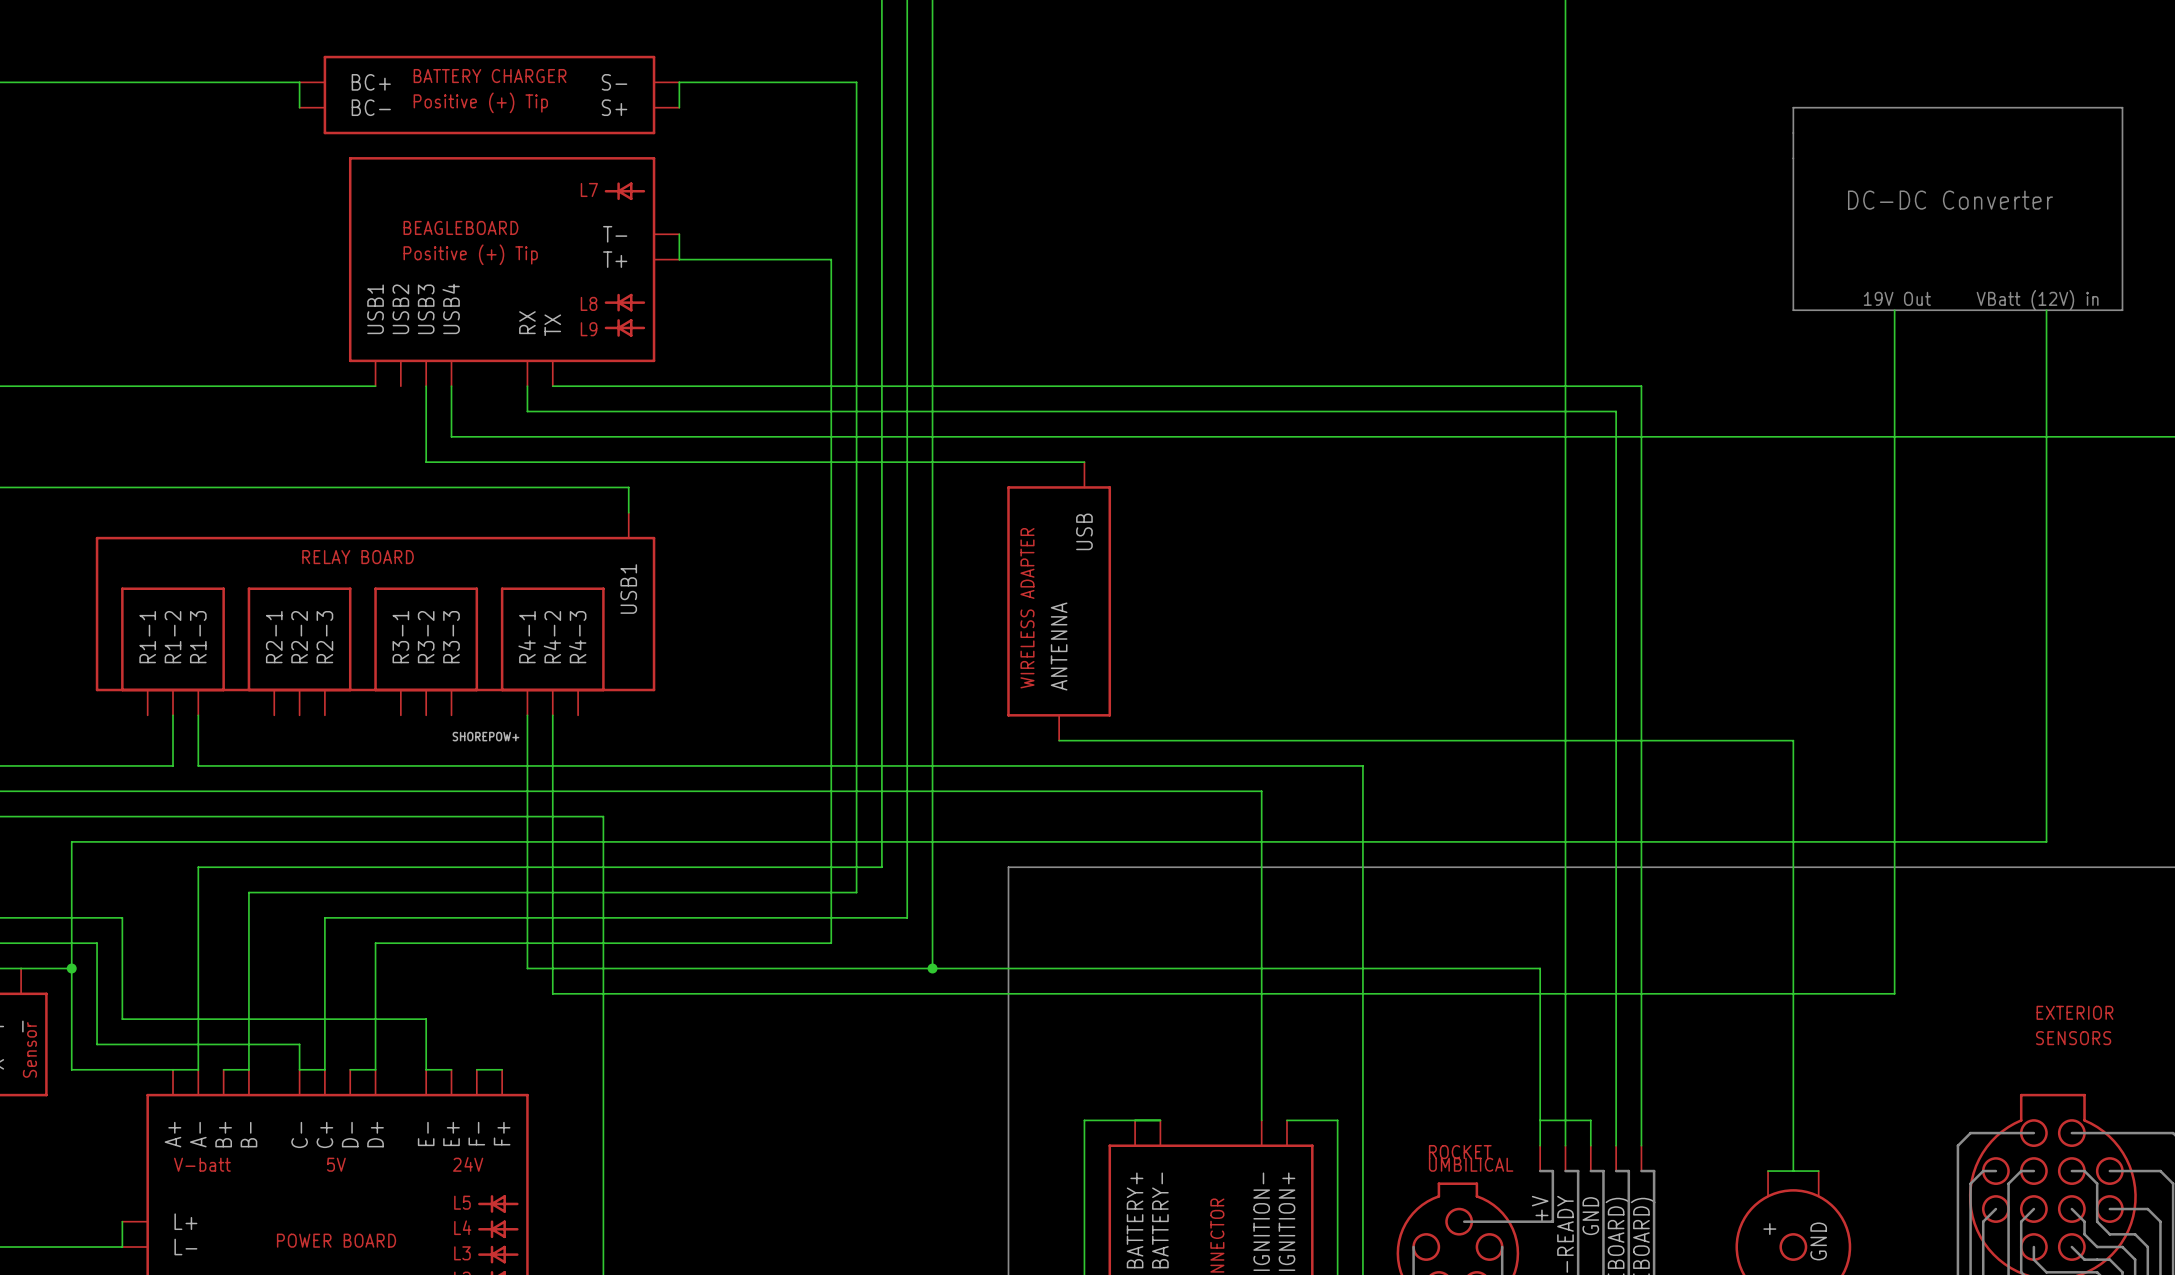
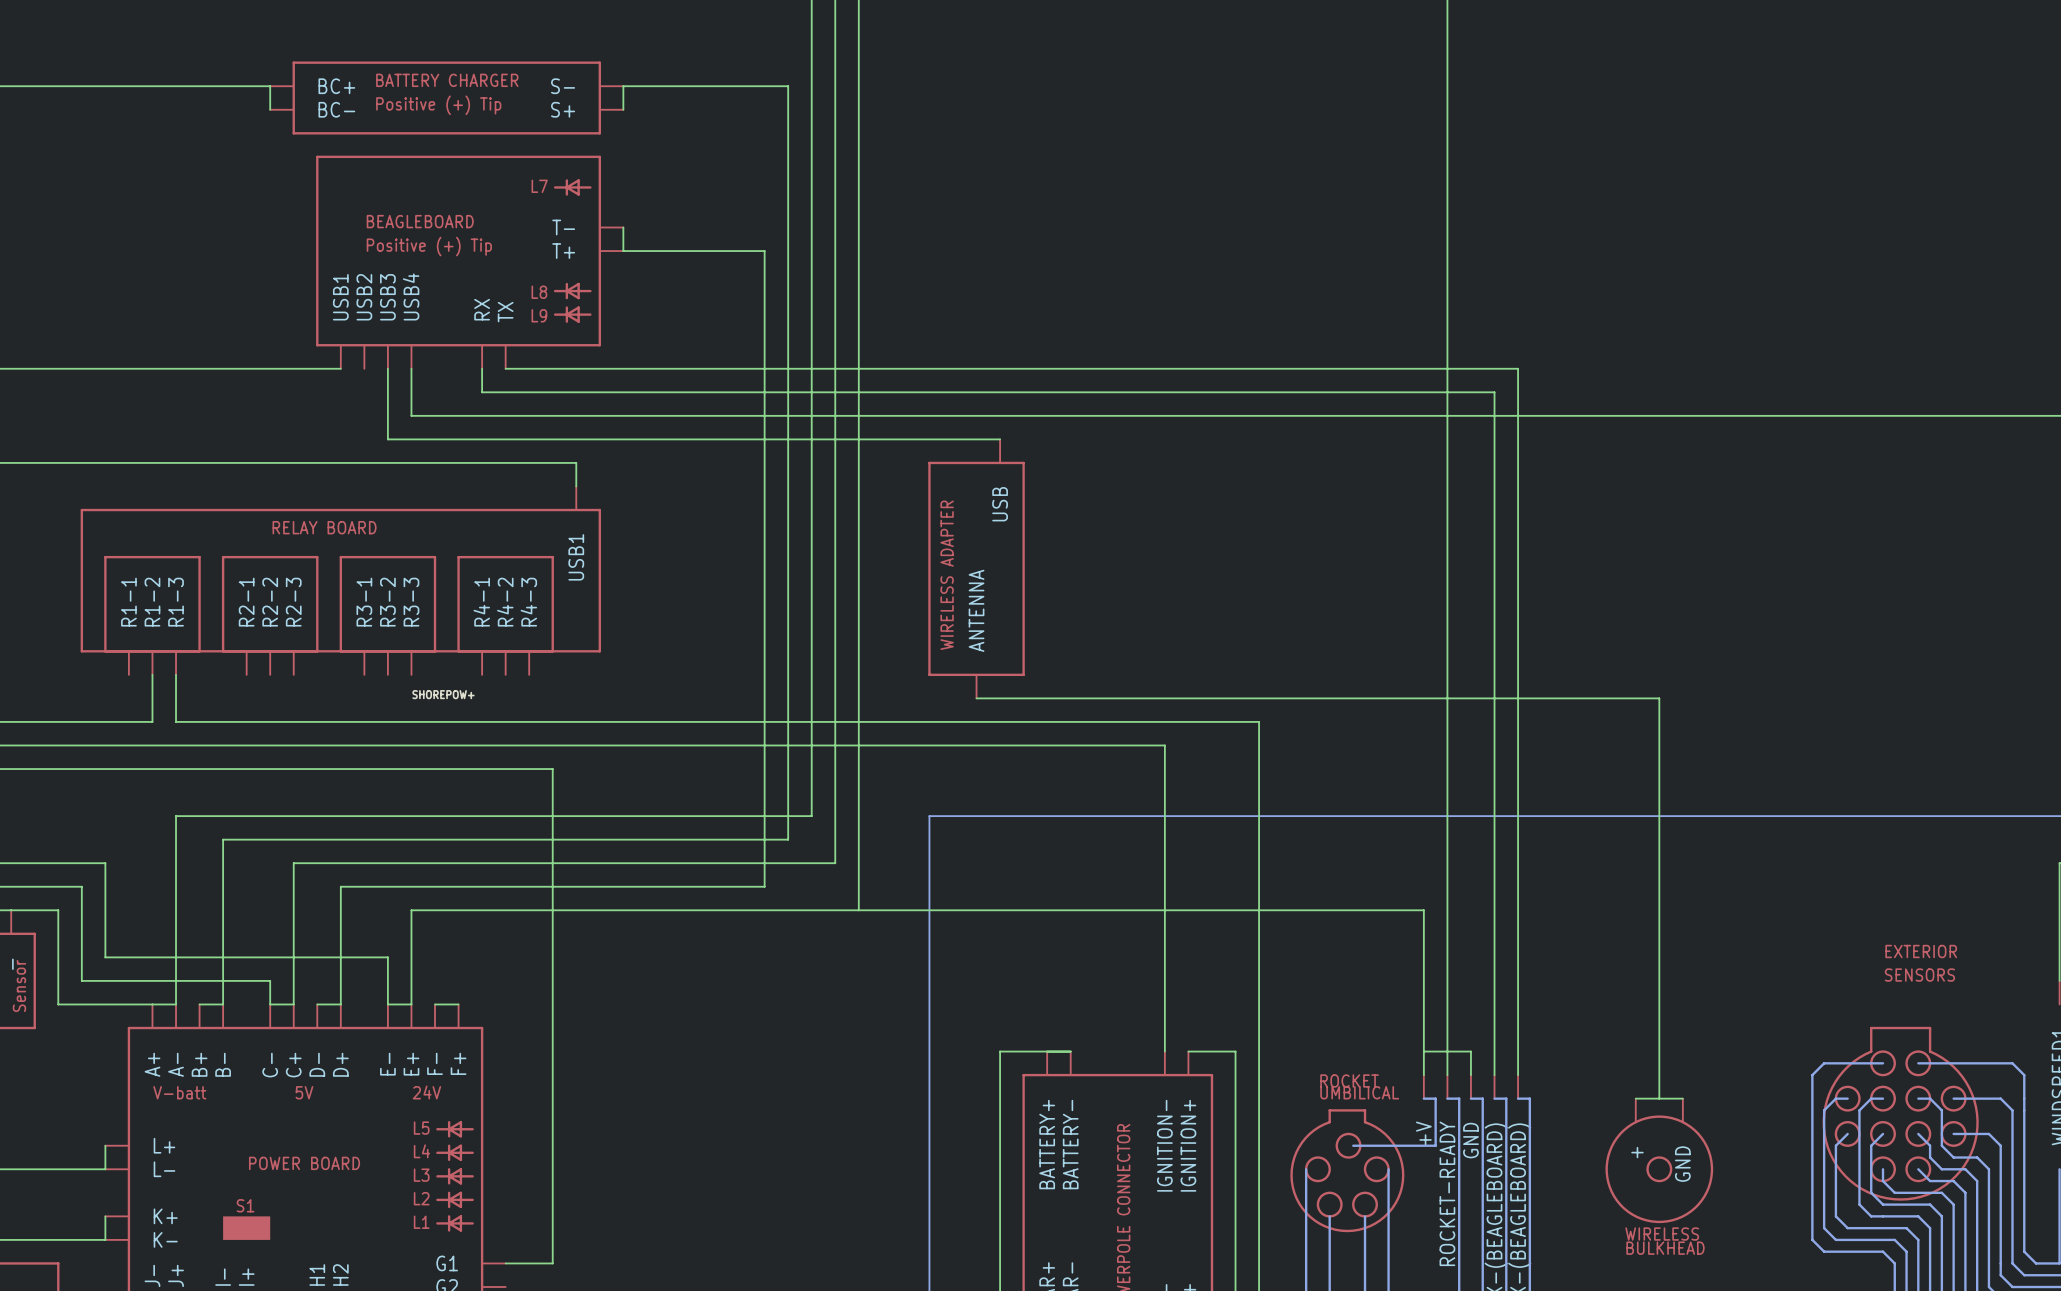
line: (1793, 107) (1793, 310) (2122, 310) (2122, 107) (1793, 107) -> none
text: DC-DC Converter (1950, 200) -> none
text: 19V Out (1897, 298) -> none
text: VBatt (12V) in (2037, 300) -> none
wire: (1894, 310) (1894, 993) (552, 993) (552, 715) -> none
wire: (2046, 310) (2046, 841) (71, 841) (71, 968) -> none
wire: (527, 715) (527, 968) -> (411, 1004) (411, 910) (482, 910)
junction: (71, 968) -> none
junction: (932, 968) -> none

